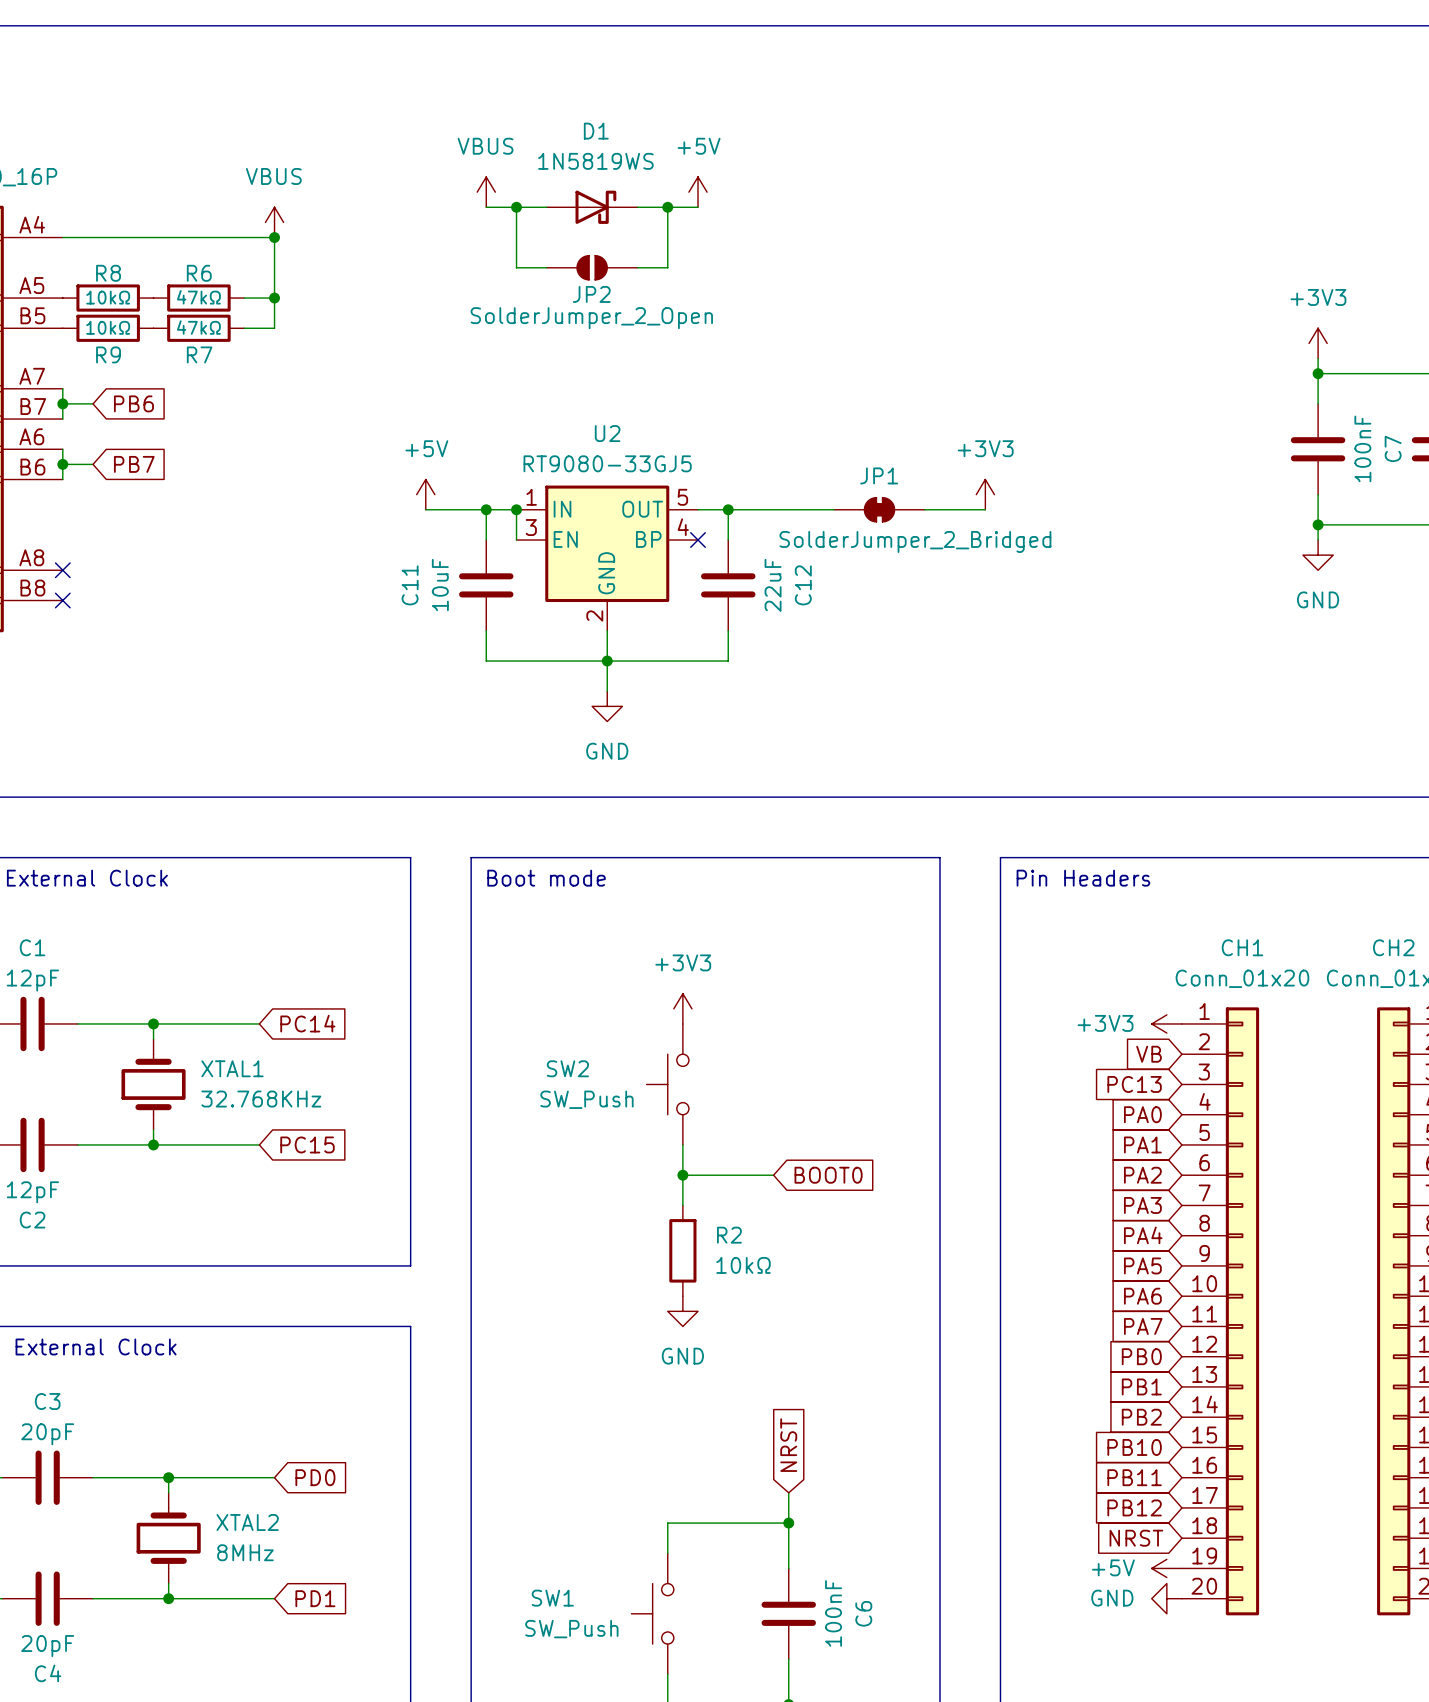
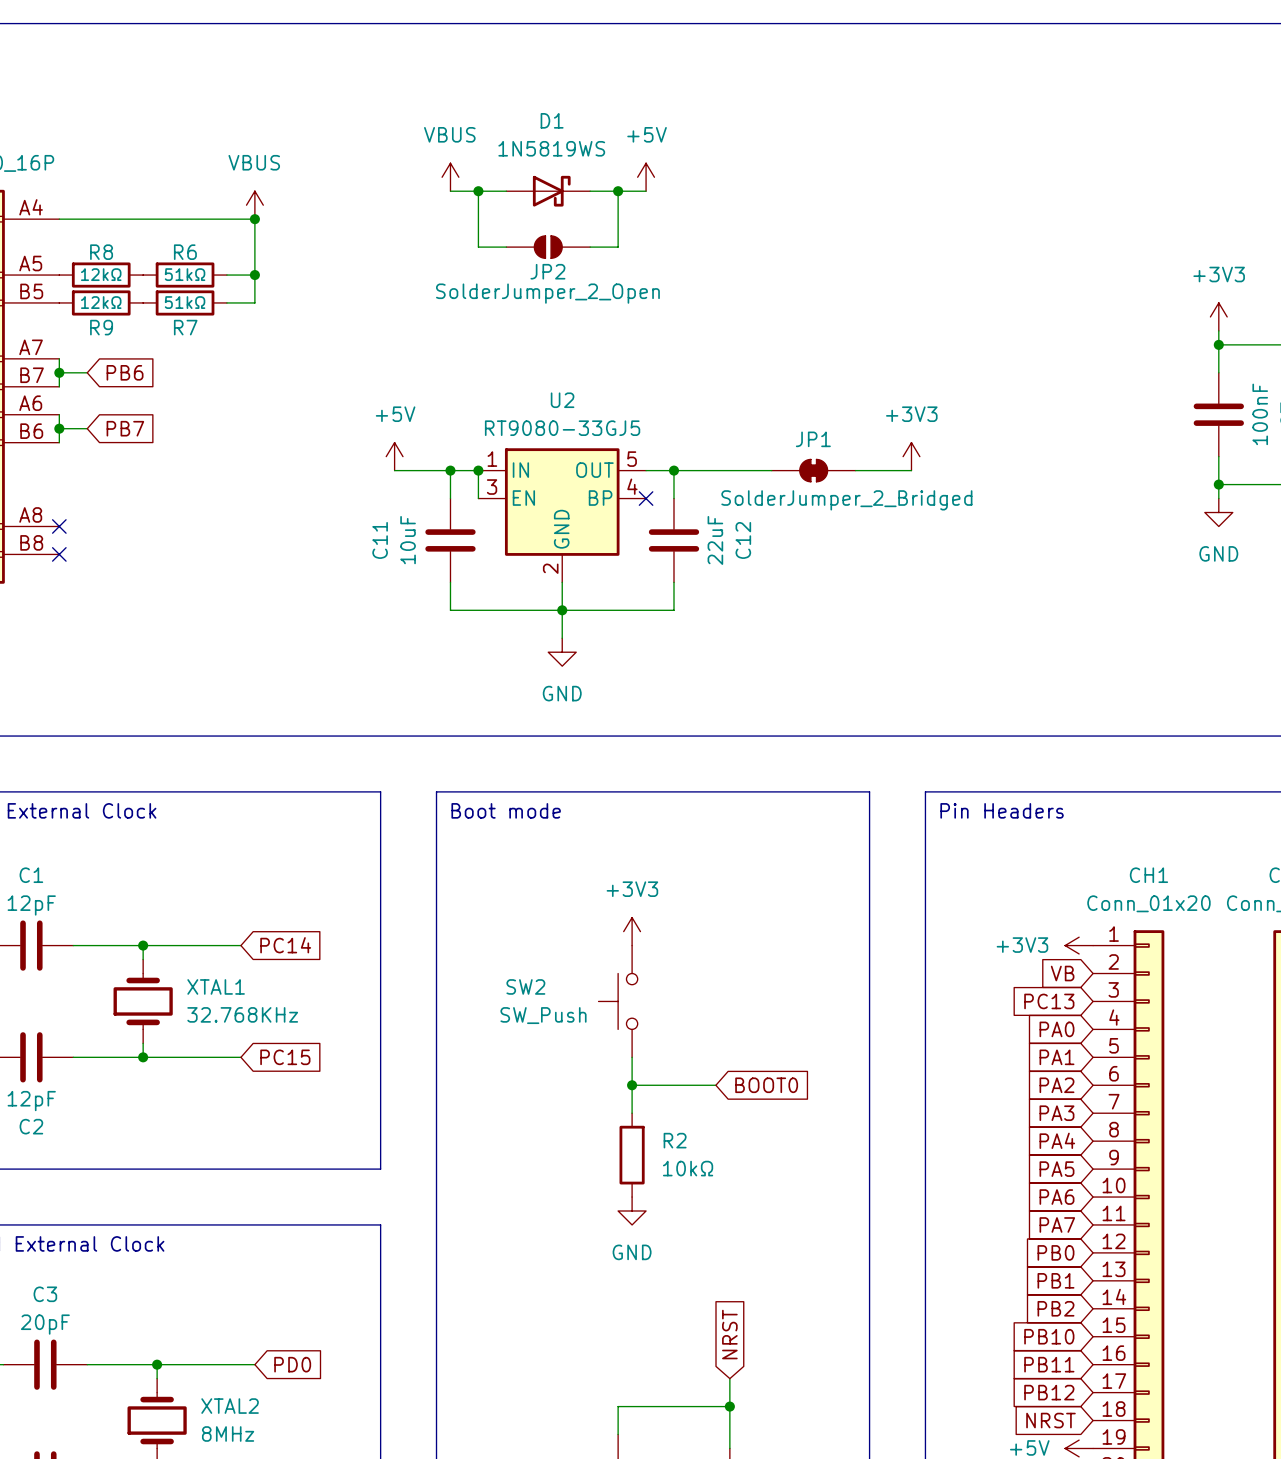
R8 value: 10kΩ (108, 297) -> 12kΩ (101, 274)
R6 value: 47kΩ (198, 297) -> 51kΩ (185, 274)
R9 value: 10kΩ (108, 327) -> 12kΩ (101, 302)
R7 value: 47kΩ (198, 327) -> 51kΩ (185, 302)

